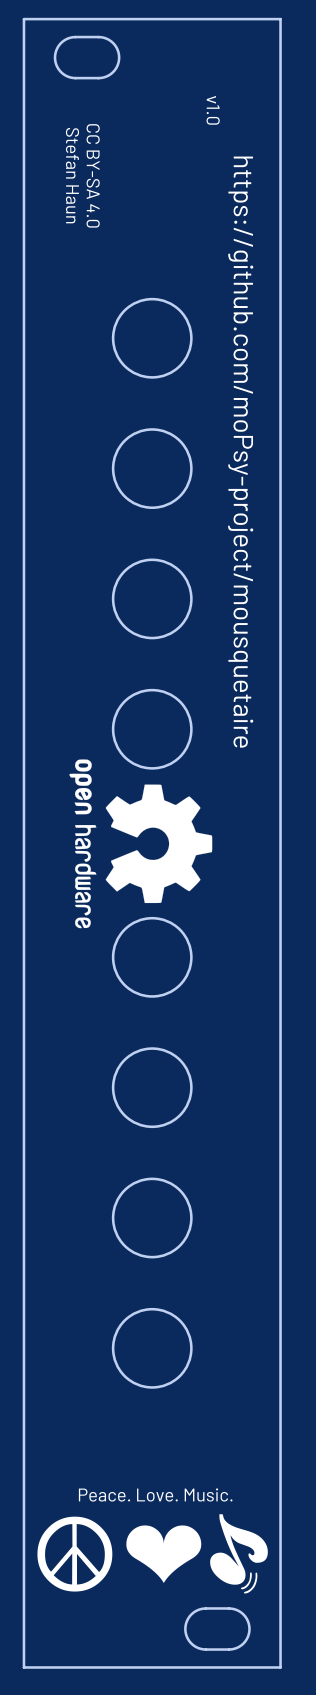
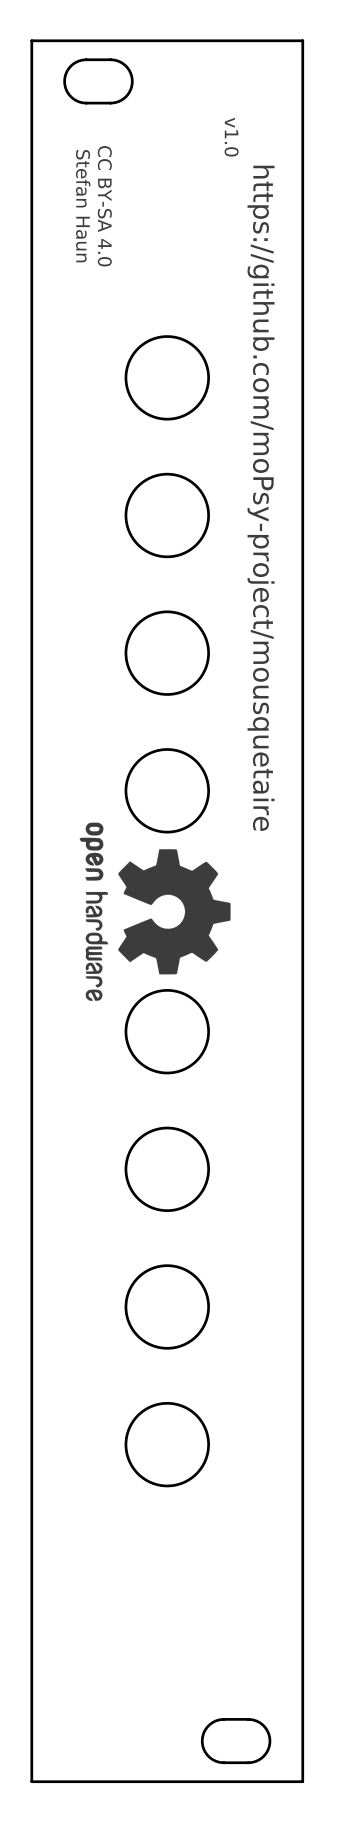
text: Peace. Love. Music. (155, 1494) -> none
drawing: [37, 1514, 268, 1594] -> none

